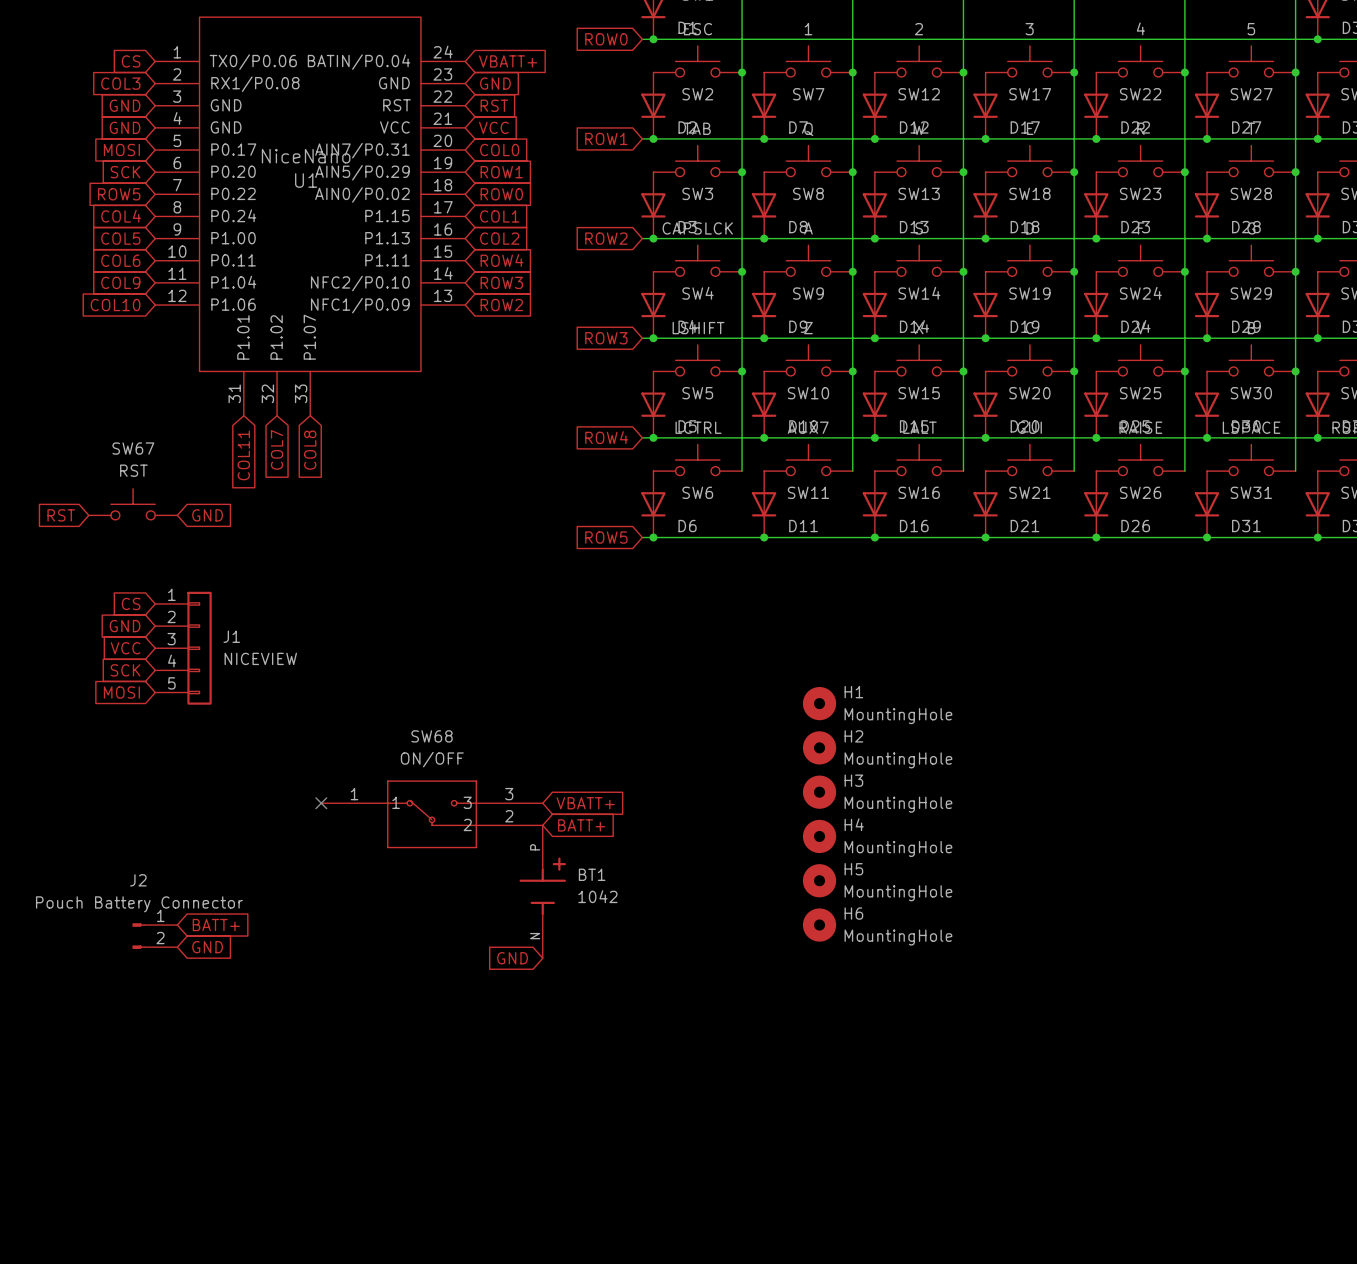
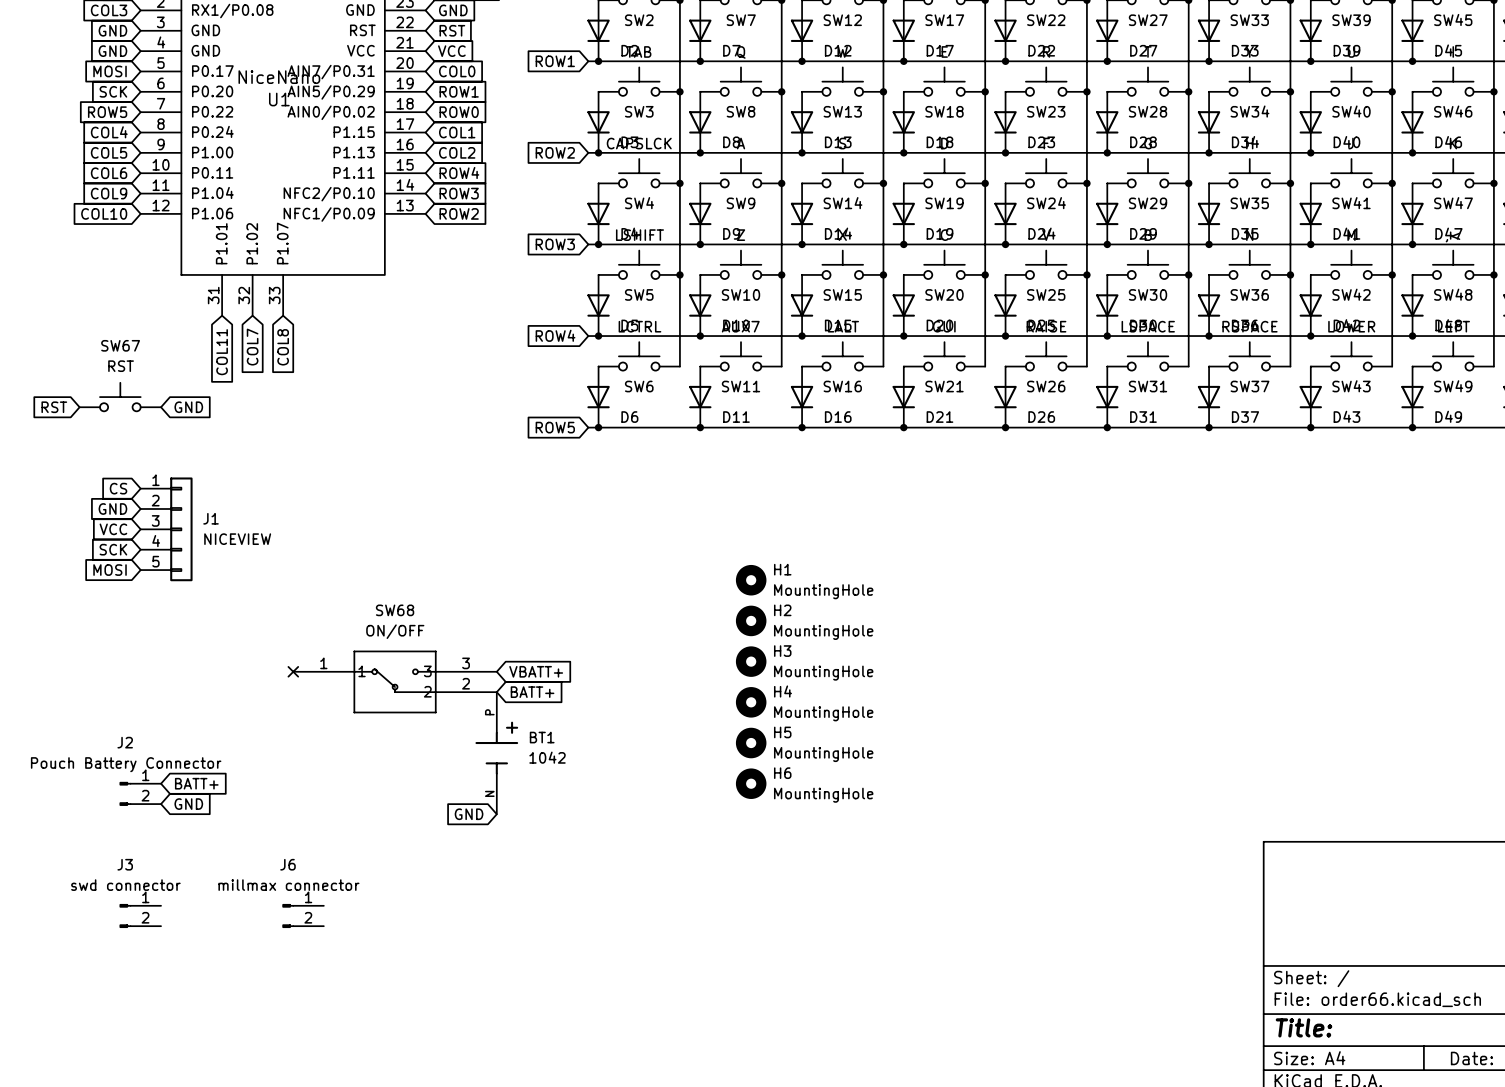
J3: none -> swd connector (140, 915)
J6: none -> millmax connector (303, 915)

